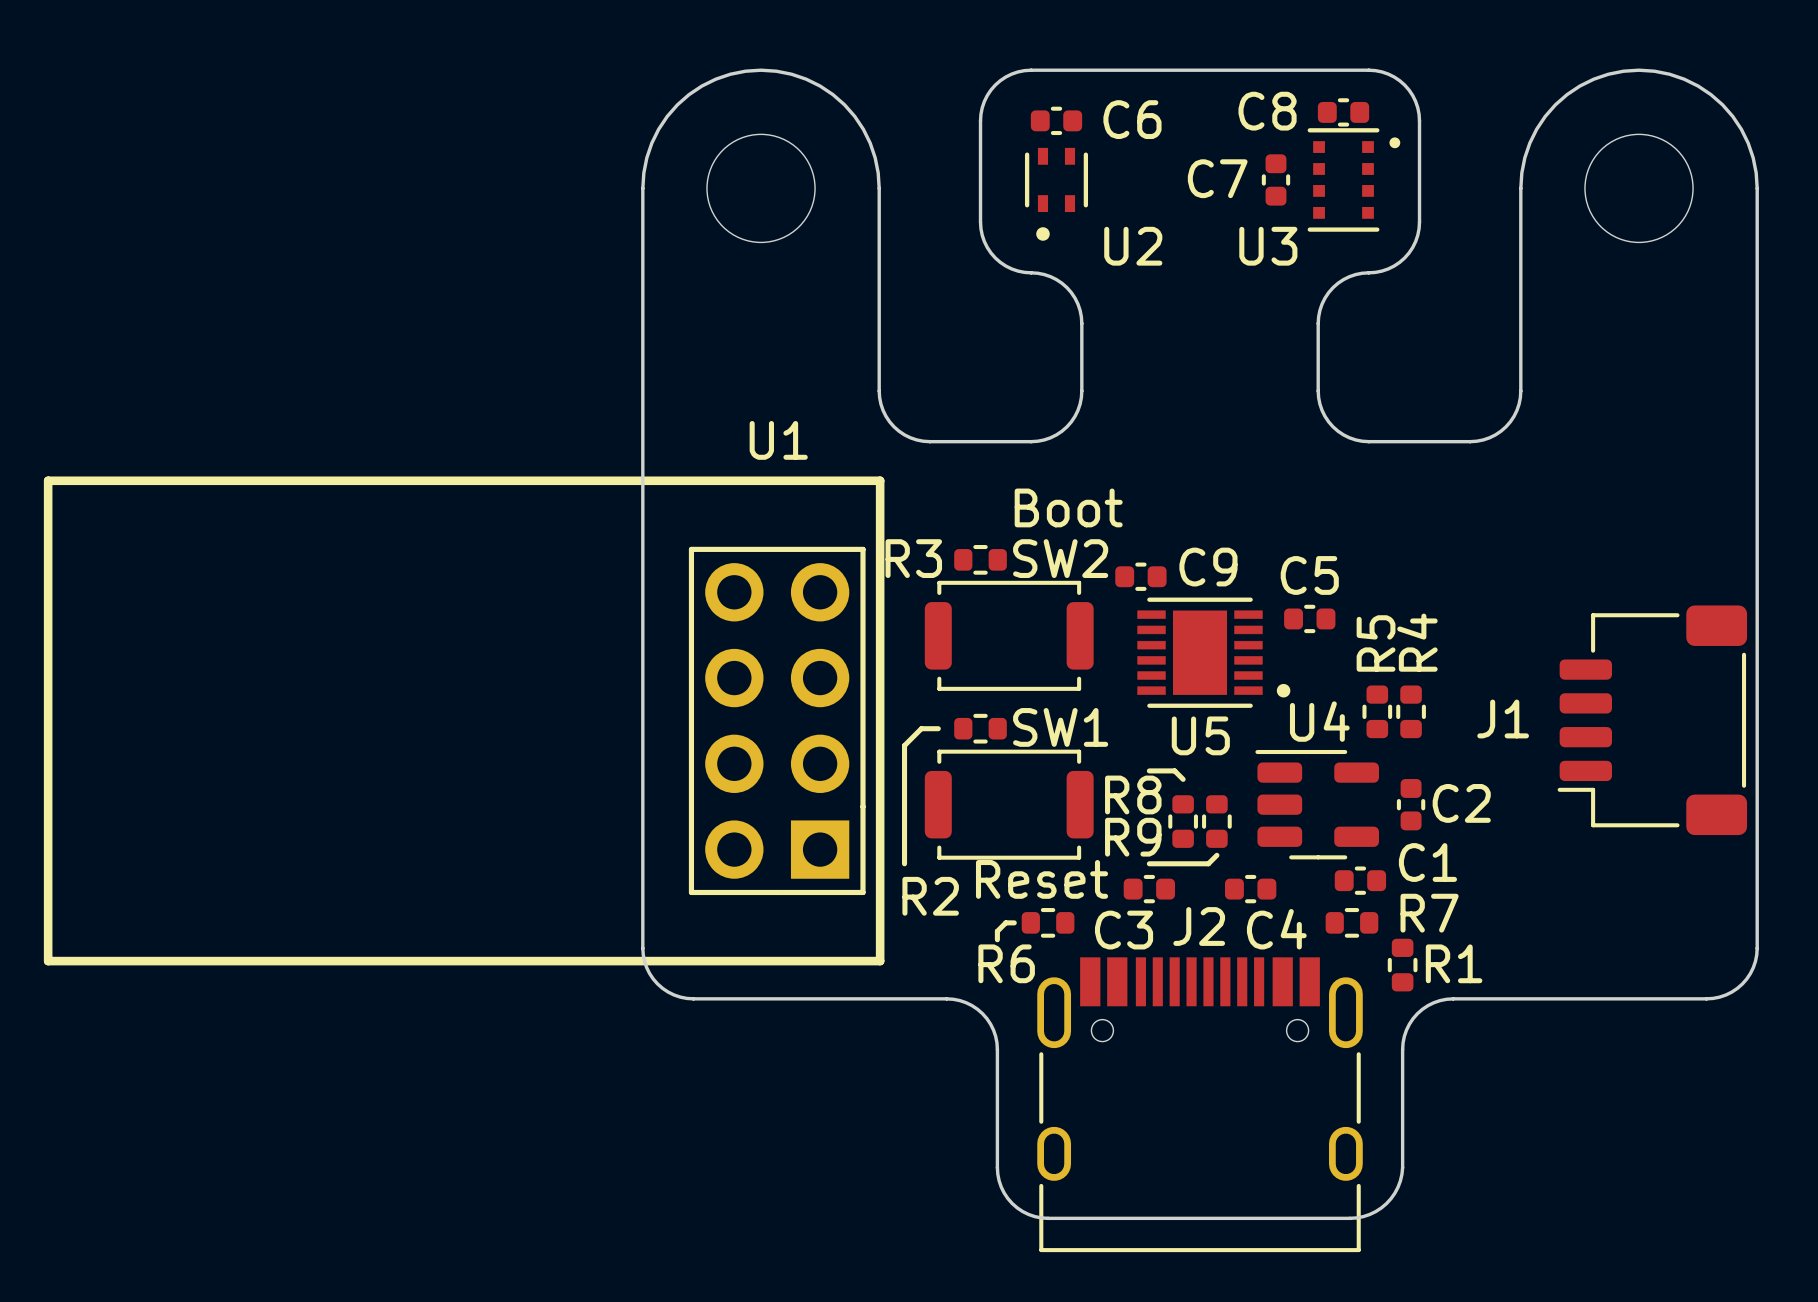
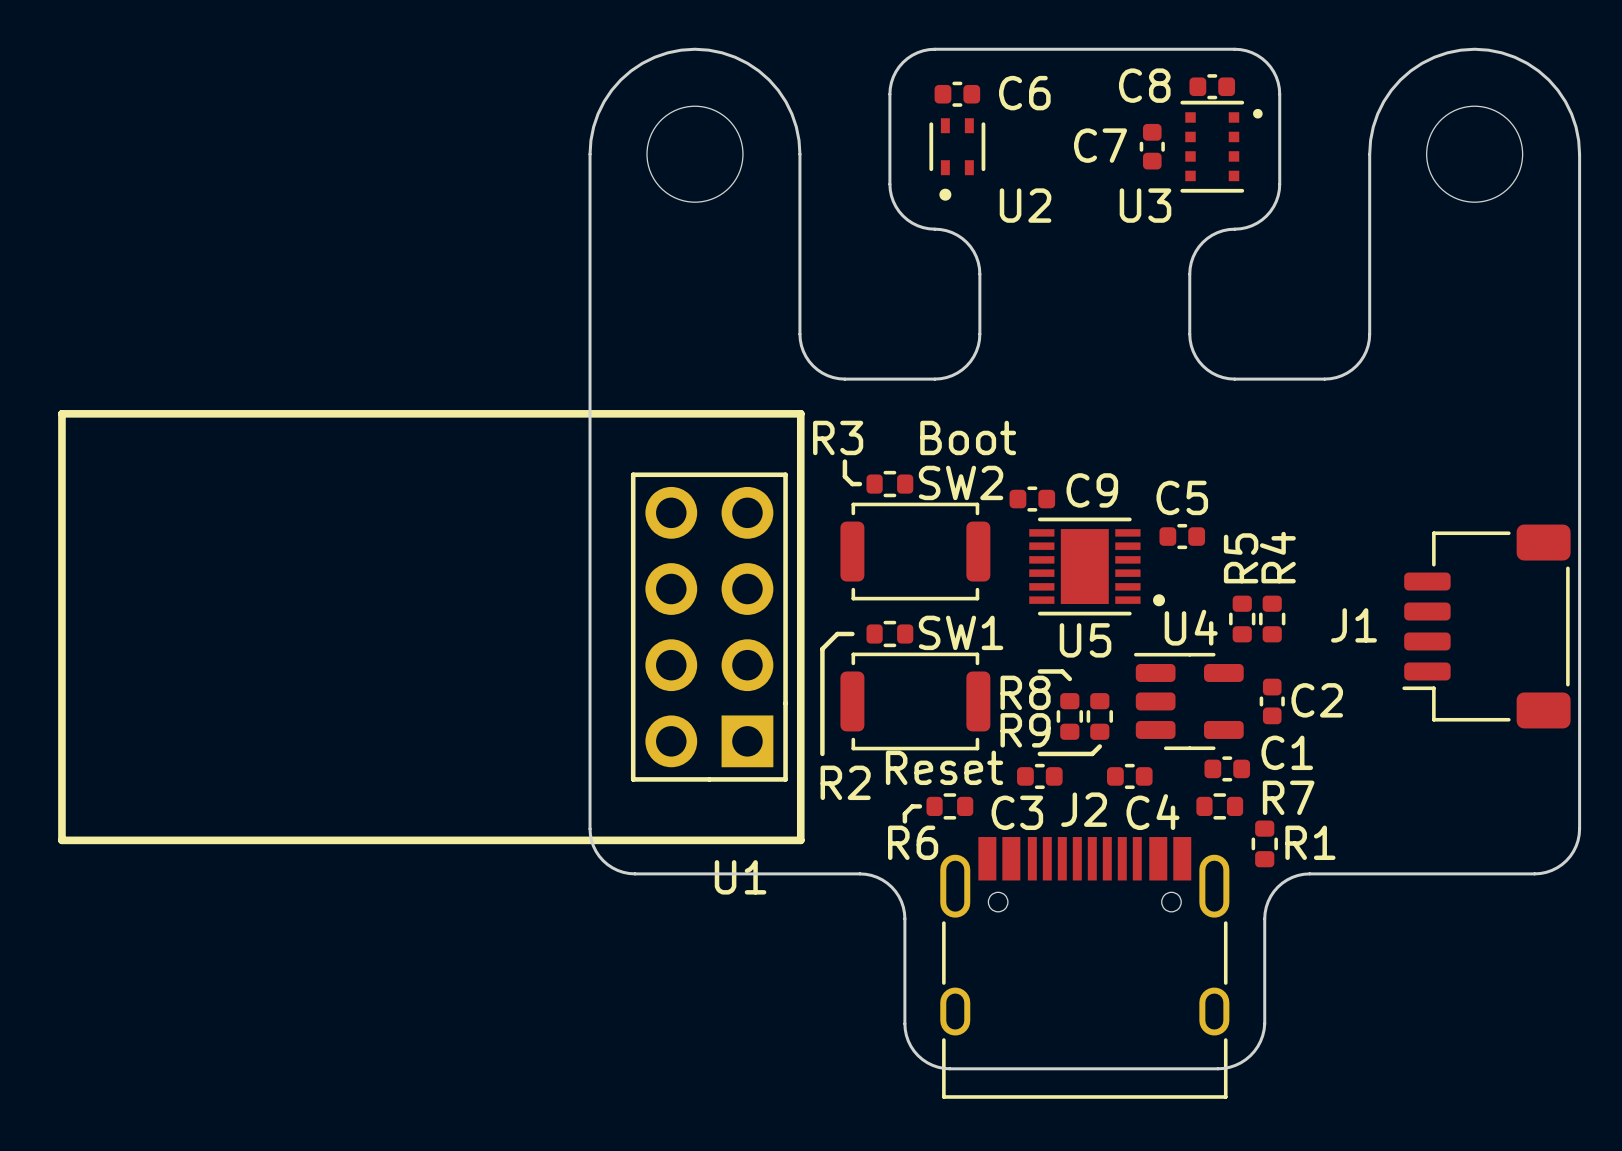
U1 name position: U1 (778, 440) -> U1 (740, 877)
line: none -> (844, 461) (844, 476) (852, 484) (859, 484)
R3 name position: R3 (913, 558) -> R3 (838, 437)

